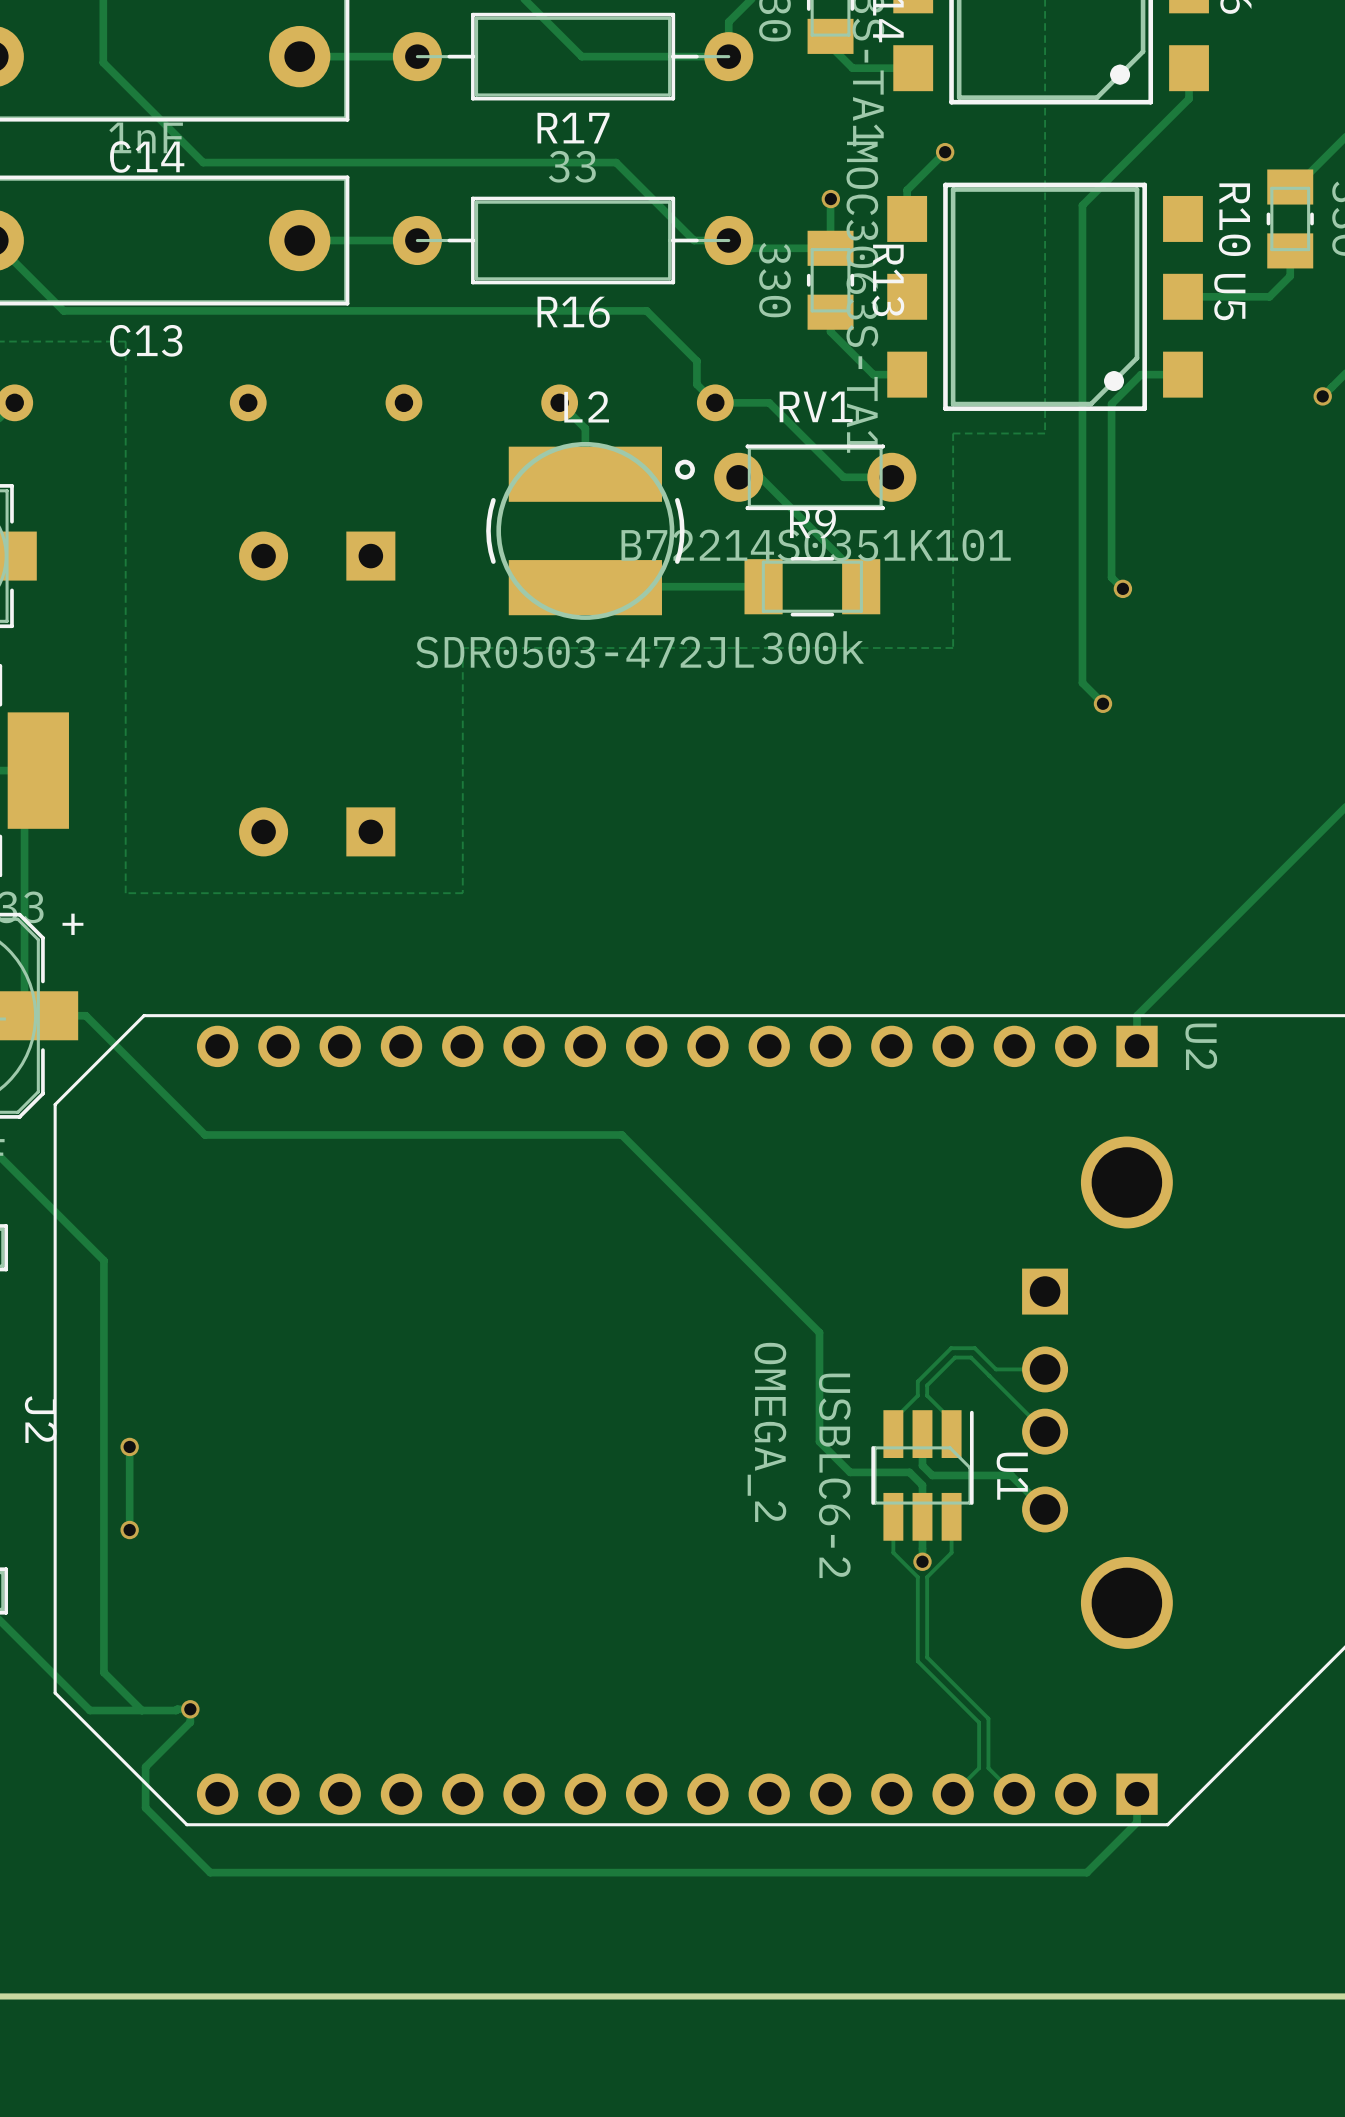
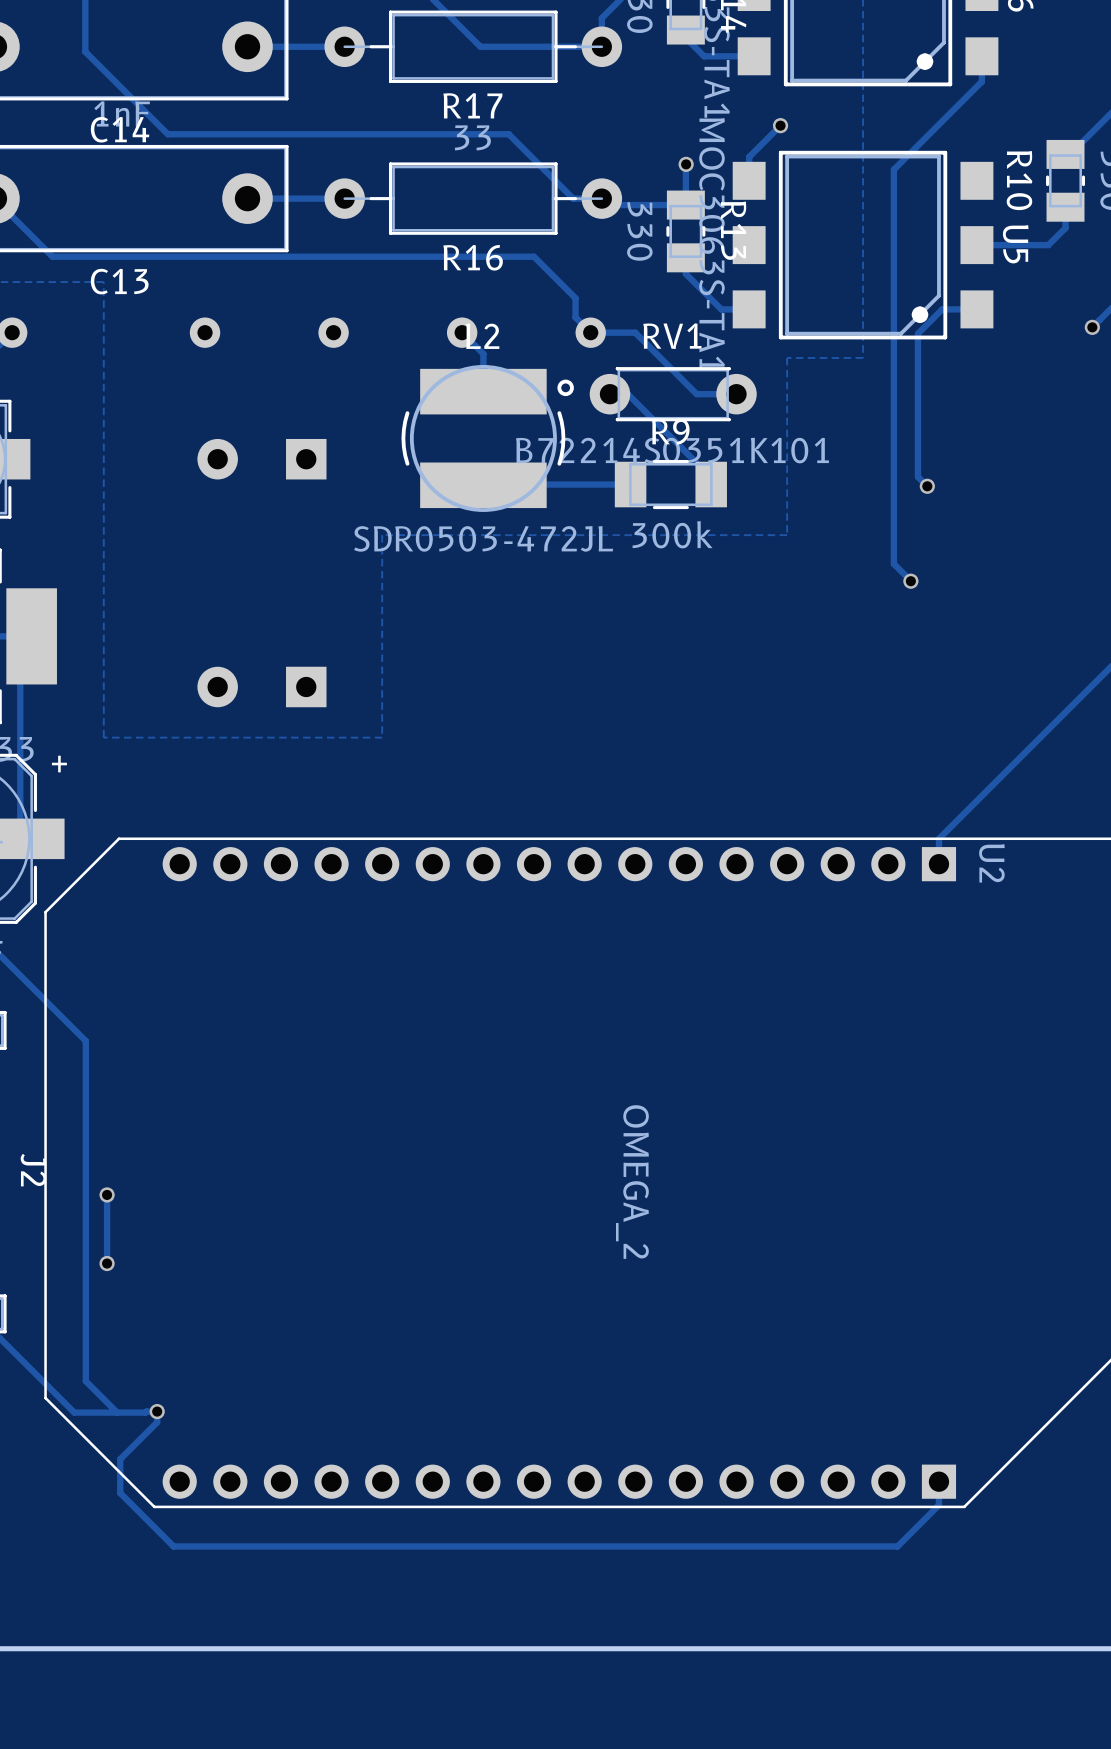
track: (24, 1015) (85, 1015) (205, 1134) (621, 1134) (819, 1332) (819, 1441) (850, 1472) (909, 1472) (922, 1485) (922, 1561) -> none
track: (1045, 1369) (996, 1369) (974, 1348) (951, 1348) (917, 1381) (917, 1395) (893, 1420) (893, 1434) -> none
part: (1097, 1392) -> none
track: (1045, 1431) (970, 1357) (955, 1357) (927, 1385) (927, 1395) (951, 1420) (951, 1434) -> none
track: (922, 1434) (922, 1465) (932, 1475) (1011, 1475) (1045, 1509) -> none
U1: USBLC6-2 (922, 1475) -> none
track: (893, 1516) (893, 1552) (917, 1577) (917, 1661) (979, 1722) (979, 1768) (953, 1794) -> none
track: (951, 1516) (951, 1552) (927, 1577) (927, 1657) (988, 1718) (988, 1768) (1014, 1794) -> none
via: (922, 1561) -> none

